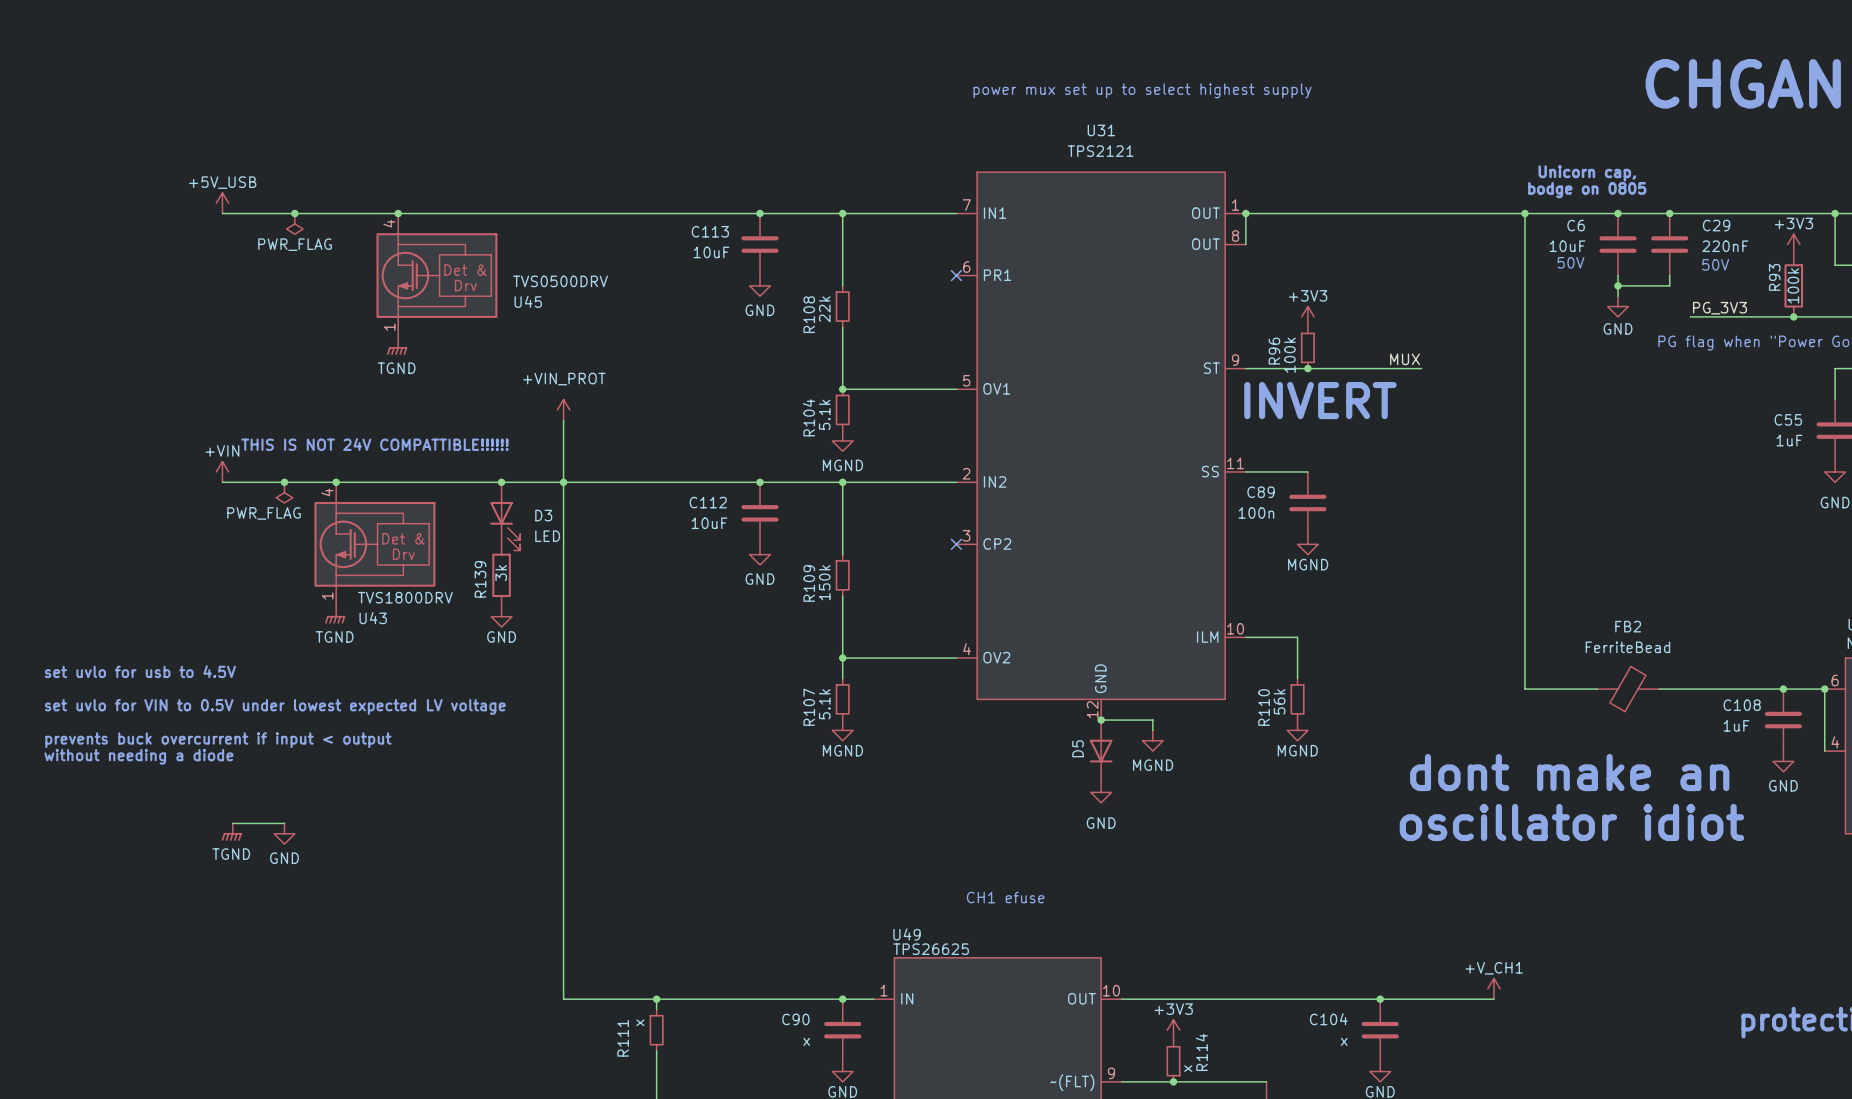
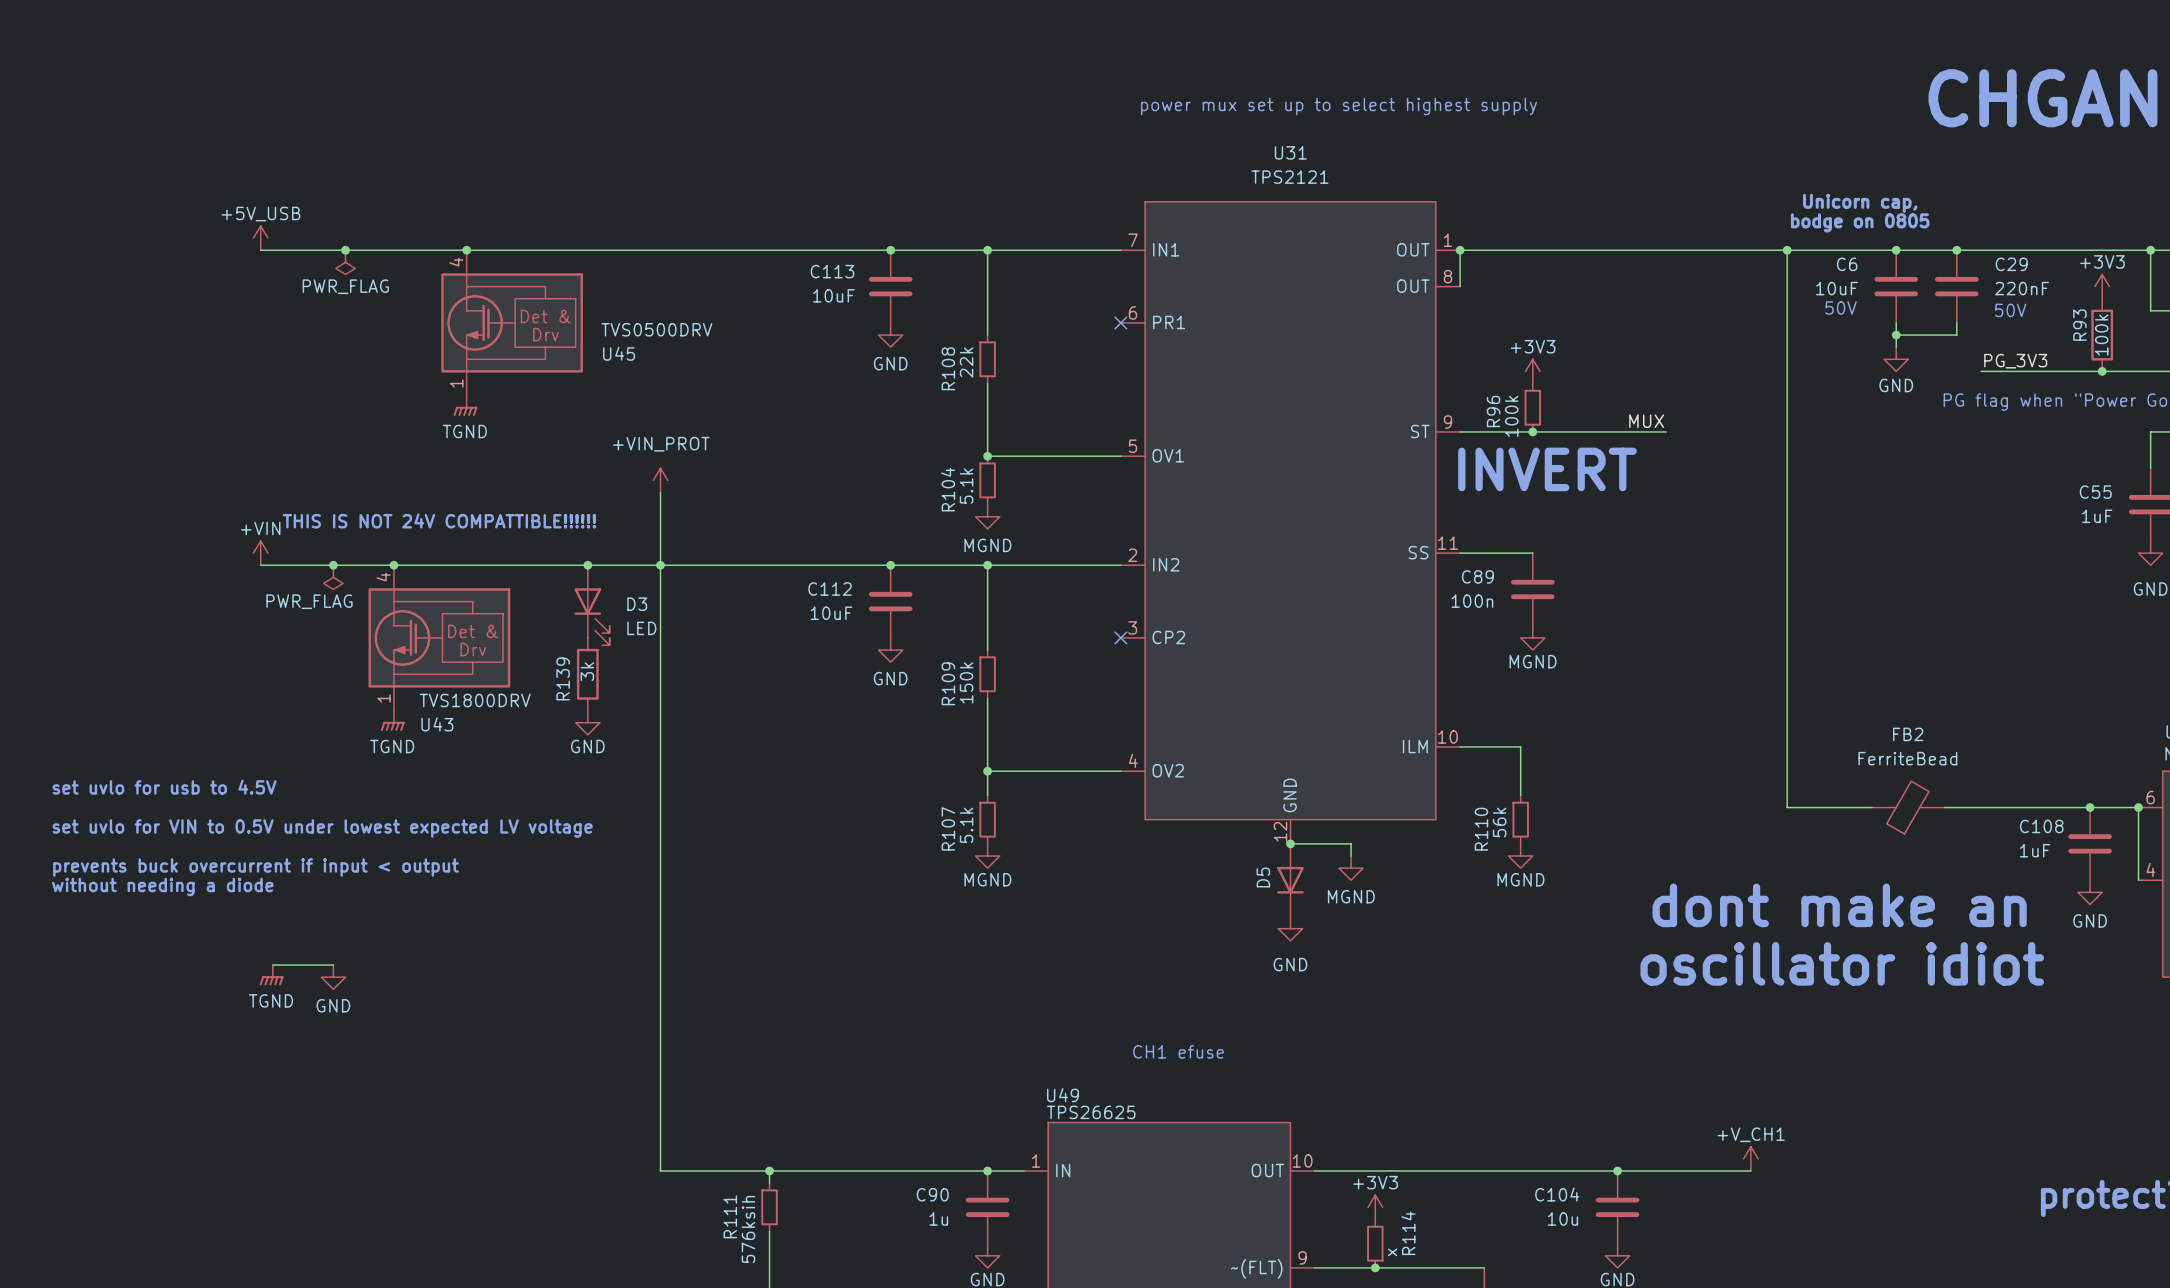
R111 value: x (640, 1022) -> 576ksih (748, 1229)
C90 value: x (806, 1041) -> 1u (938, 1219)
C104 value: x (1344, 1041) -> 10u (1562, 1219)

